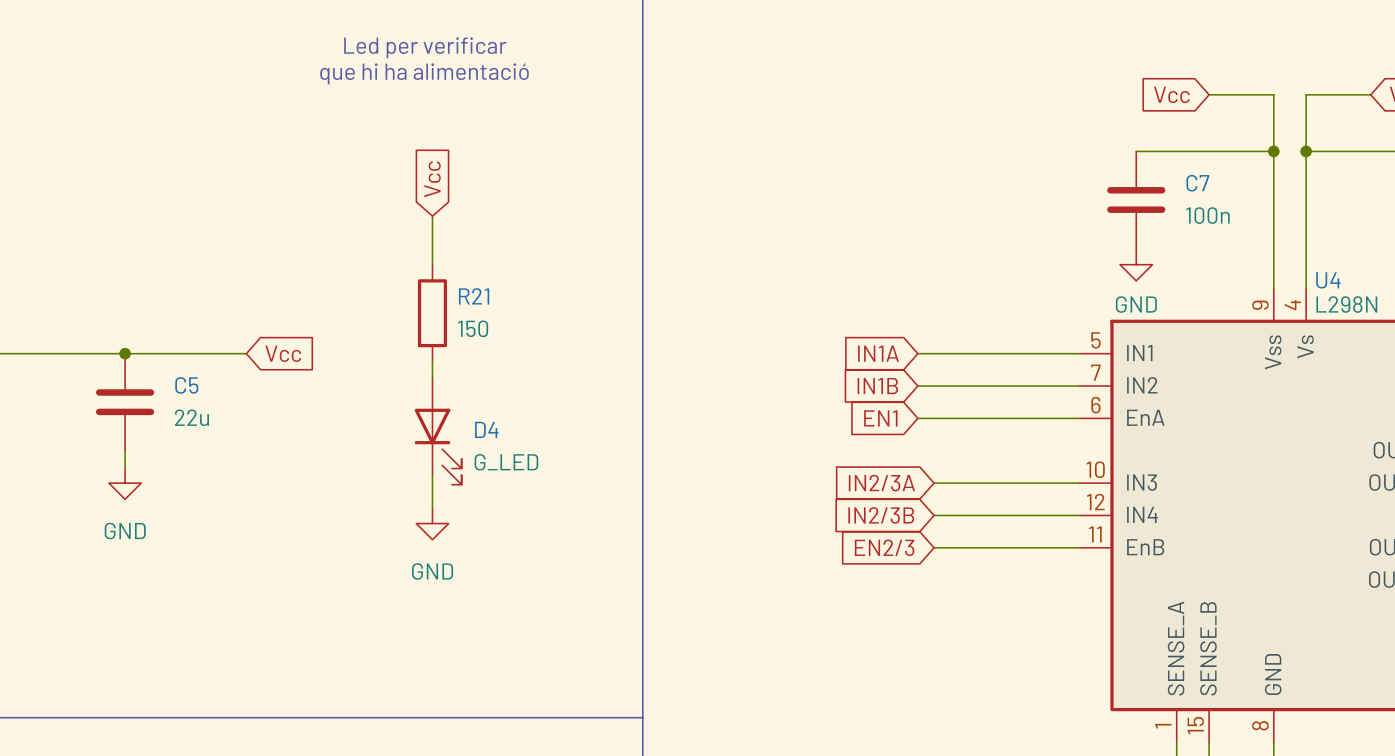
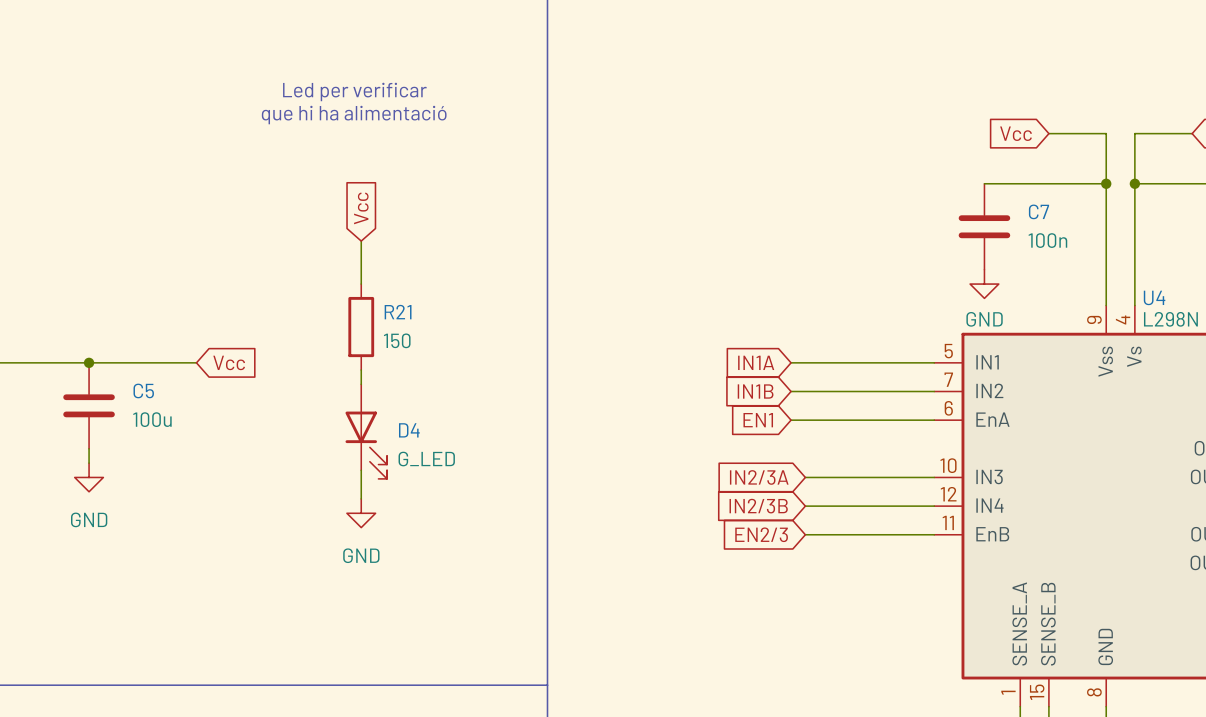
C5 value: 22u (191, 417) -> 100u (152, 419)

